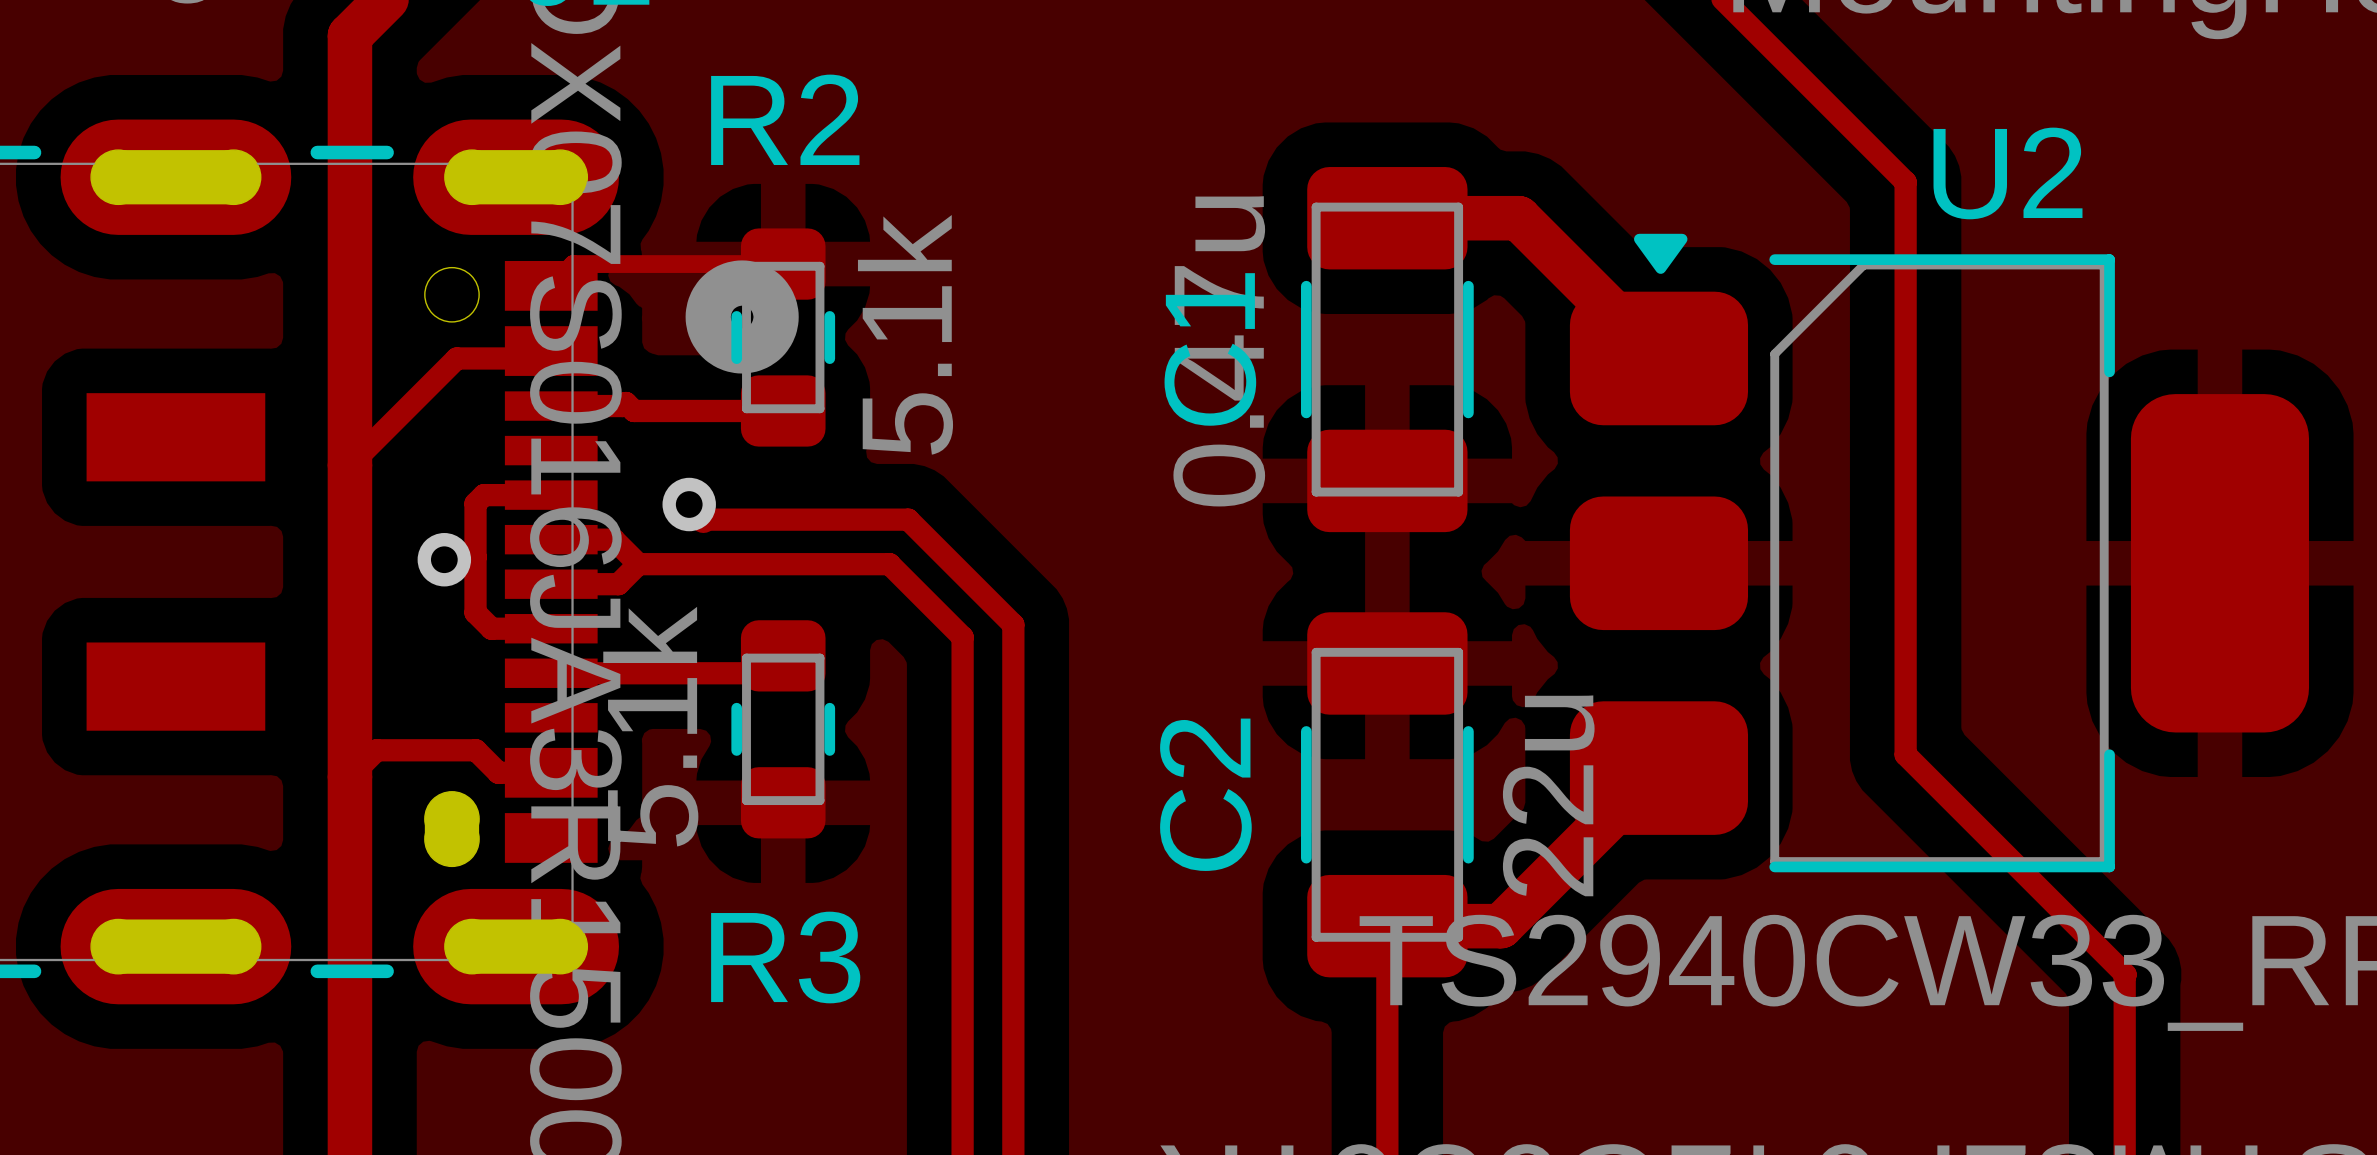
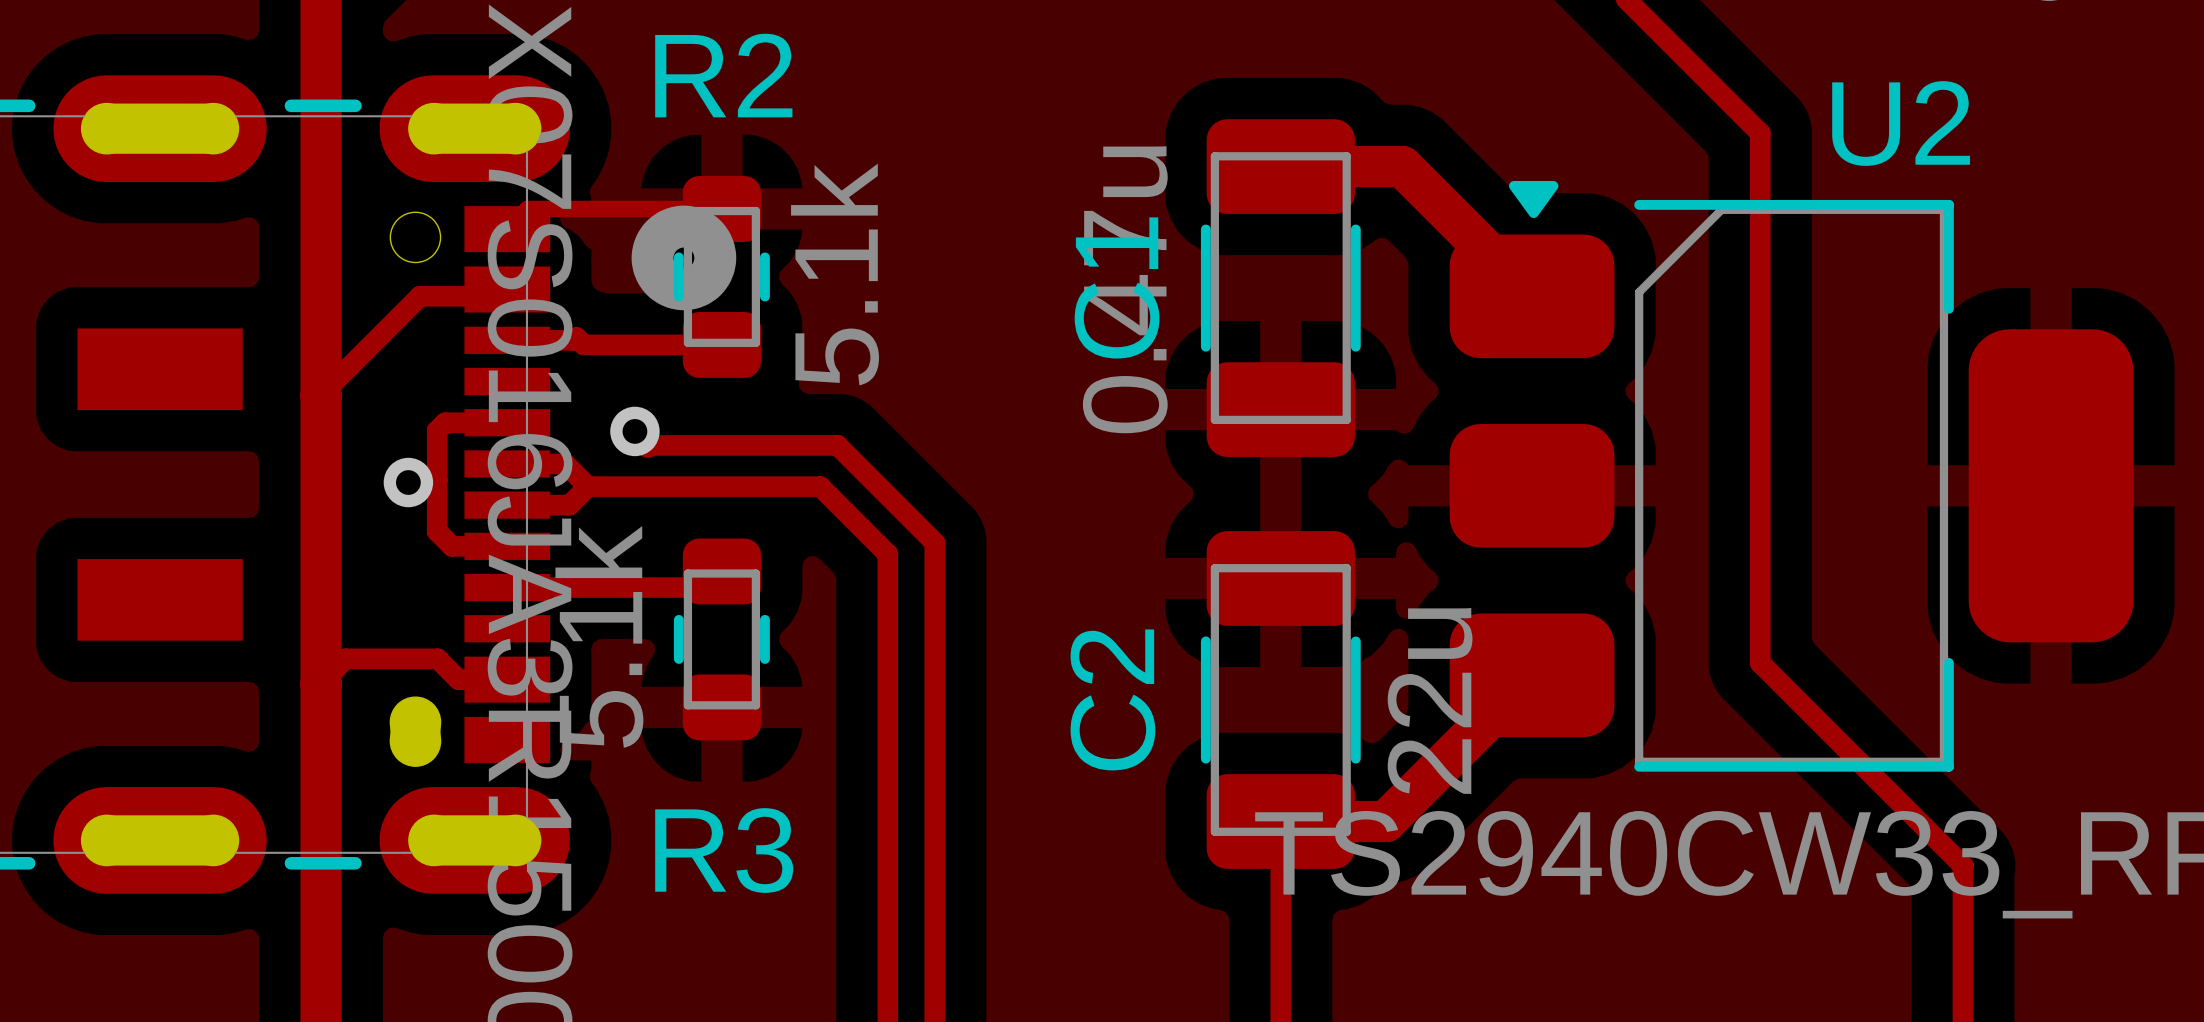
U2 name position: U2 (2008, 173) -> U2 (1901, 123)

